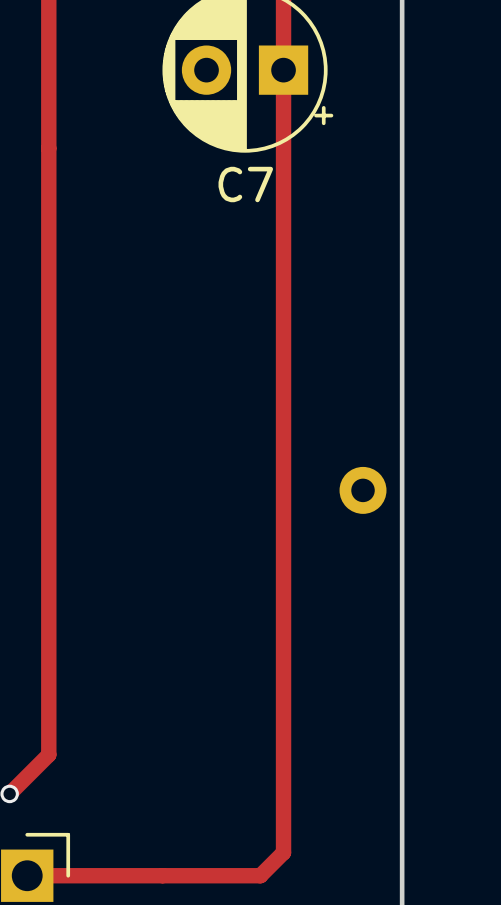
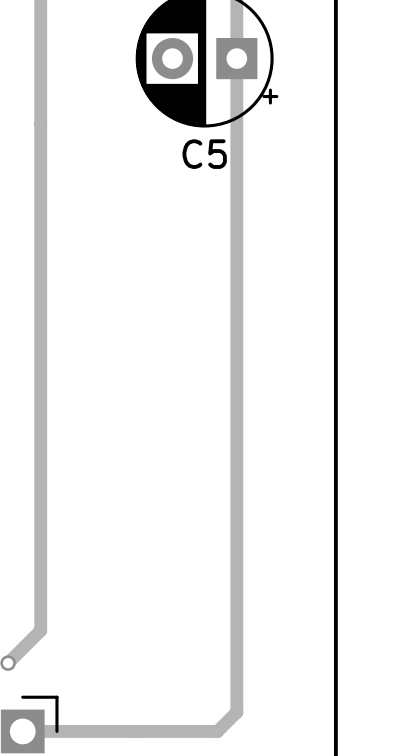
C7 name: C7 (245, 184) -> C5 (204, 154)
part: (363, 490) -> none

